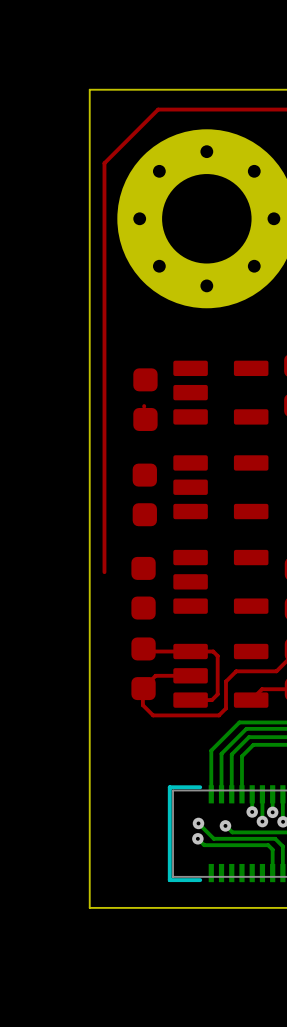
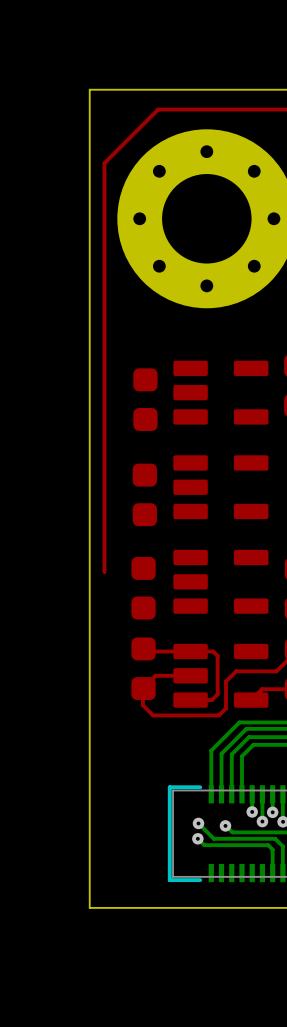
top track: (144, 406) (144, 406) -> none

